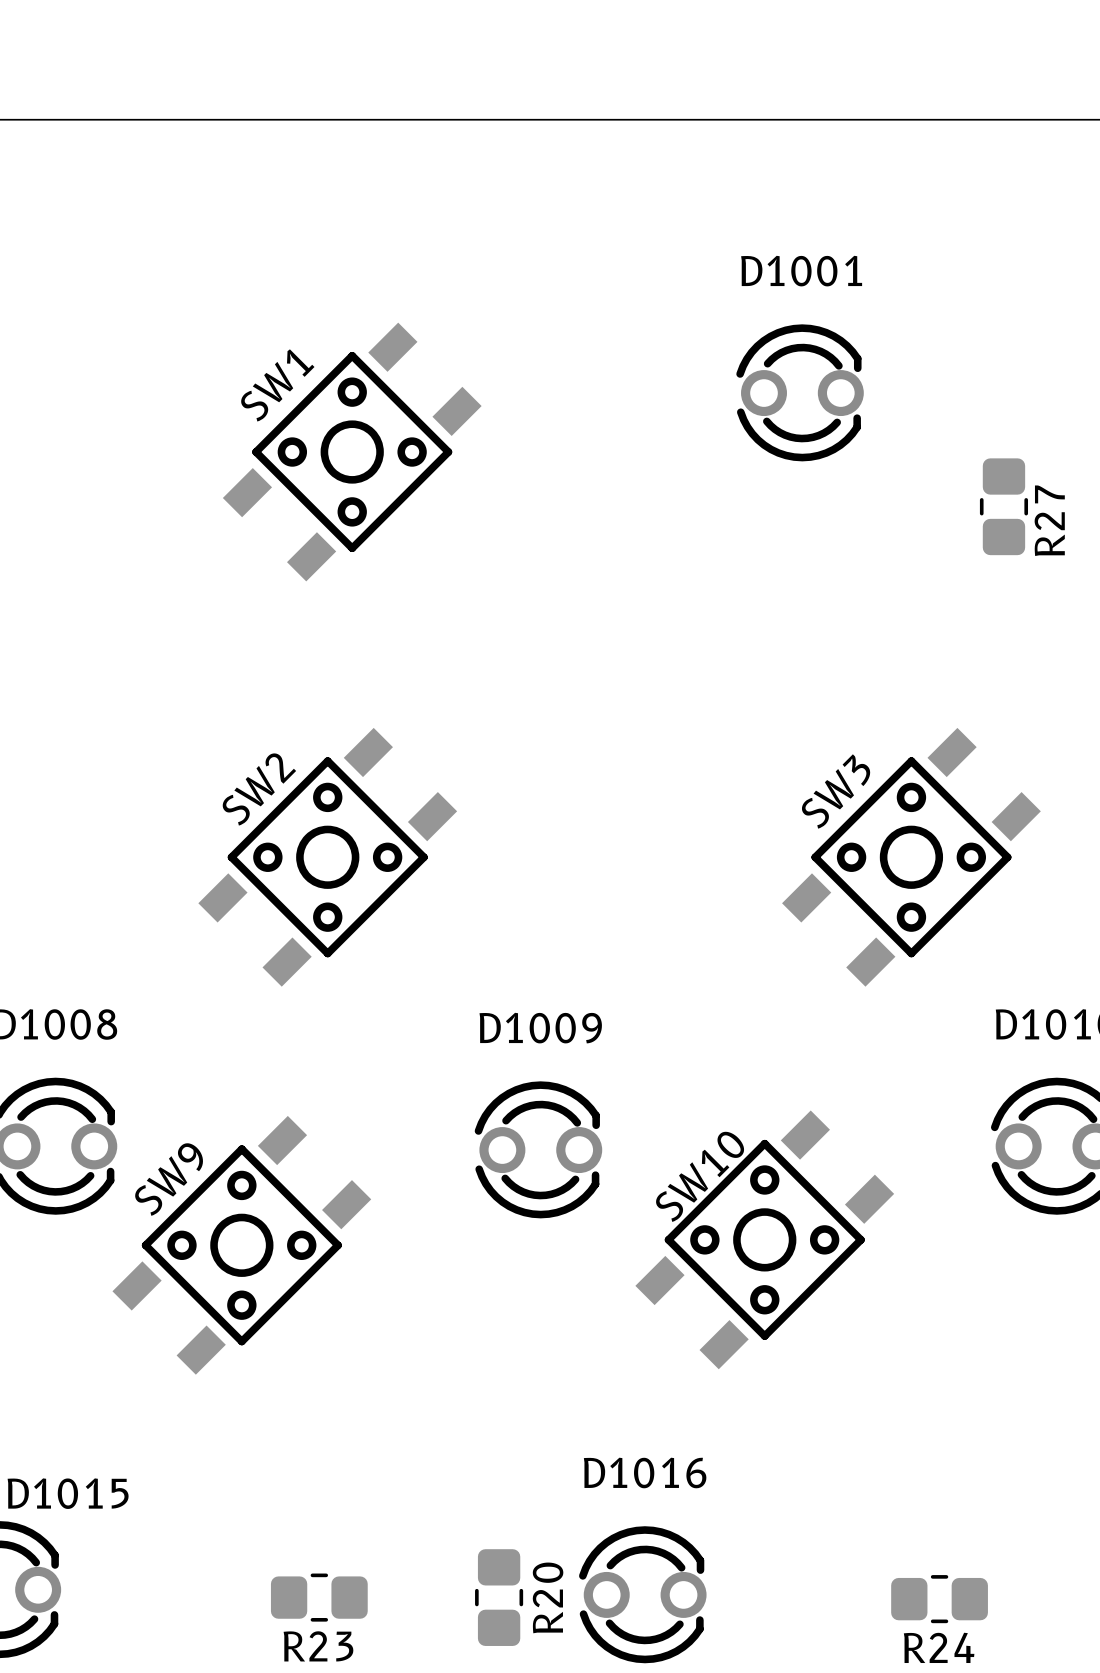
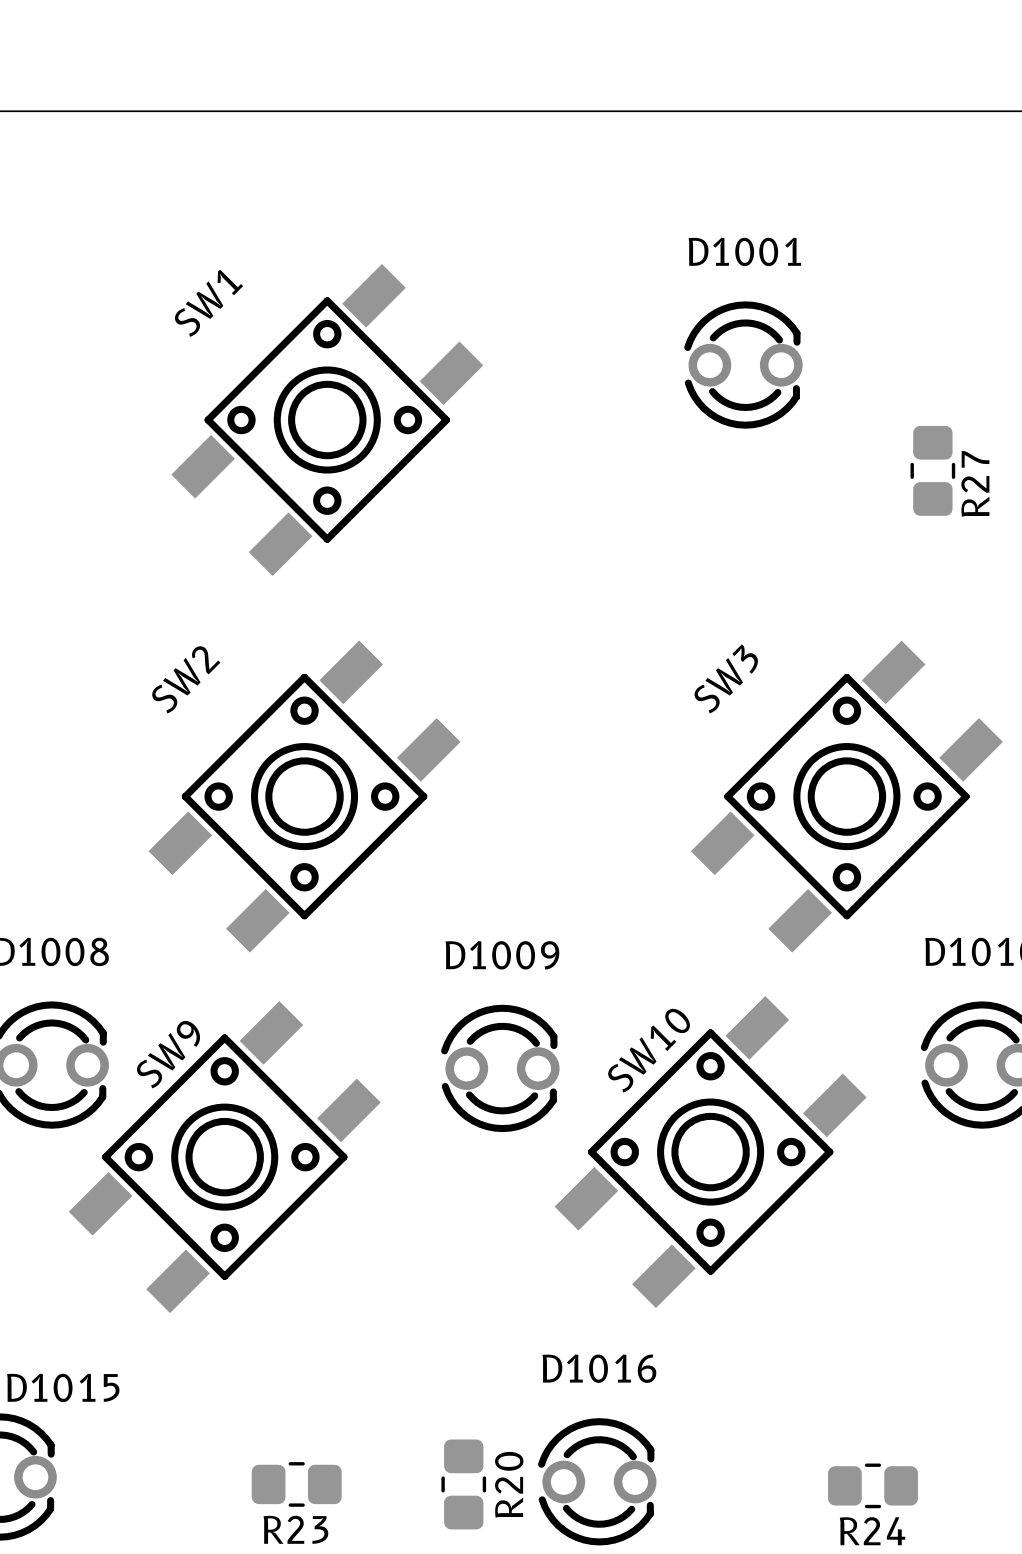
SW1 footprint: [222, 322, 482, 582] -> [171, 264, 484, 577]
SW1 name position: SW1 (277, 385) -> SW1 (208, 303)
SW2 footprint: [198, 727, 458, 987] -> [148, 640, 461, 953]
SW3 footprint: [782, 727, 1041, 987] -> [690, 640, 1003, 953]
SW2 name position: SW2 (259, 789) -> SW2 (186, 679)
SW3 name position: SW3 (835, 791) -> SW3 (726, 678)
SW10 footprint: [635, 1110, 895, 1370] -> [554, 996, 867, 1309]
SW9 footprint: [112, 1115, 372, 1375] -> [68, 1001, 381, 1314]

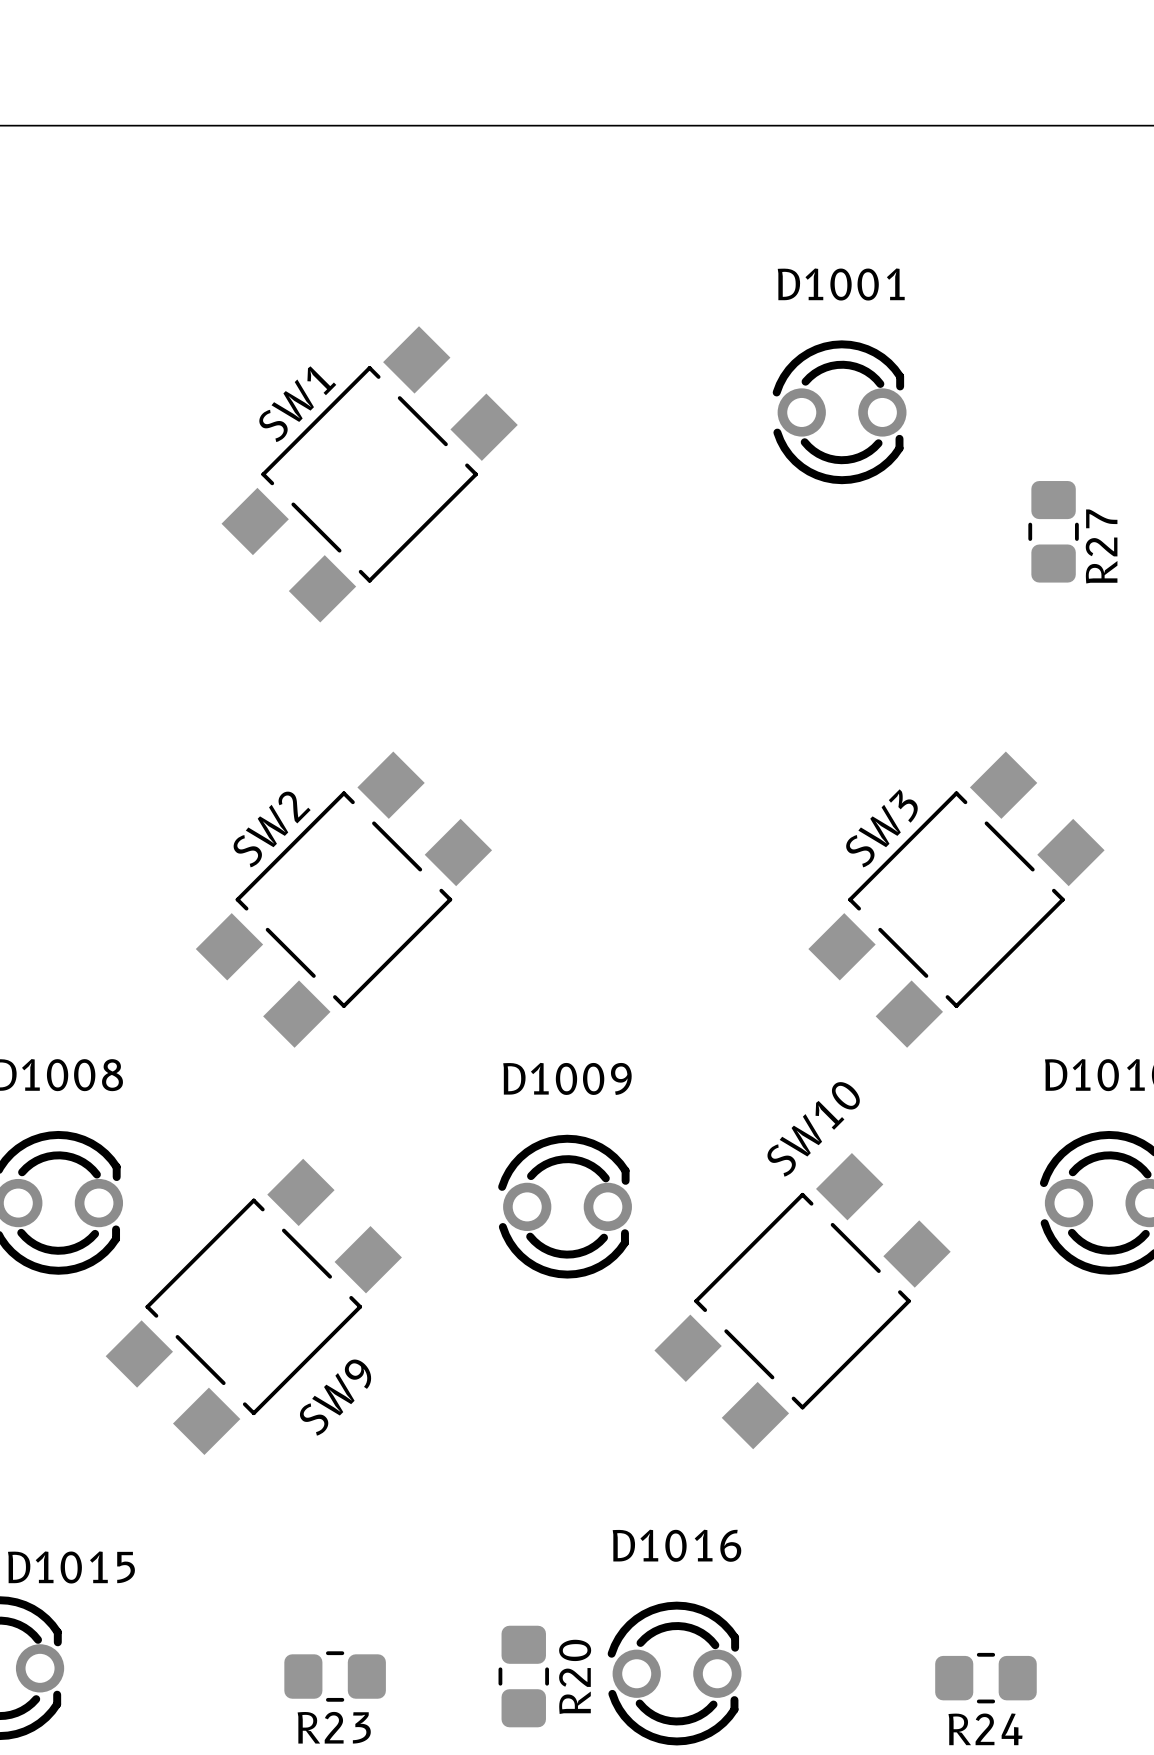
SW1 footprint: [171, 264, 484, 577] -> [221, 326, 518, 623]
SW1 name position: SW1 (208, 303) -> SW1 (297, 404)
SW2 footprint: [148, 640, 461, 953] -> [195, 751, 493, 1048]
SW3 footprint: [690, 640, 1003, 953] -> [808, 751, 1105, 1048]
SW3 name position: SW3 (726, 678) -> SW3 (881, 828)
SW2 name position: SW2 (186, 679) -> SW2 (272, 829)
SW10 footprint: [554, 996, 867, 1309] -> [654, 1153, 951, 1450]
SW9 footprint: [68, 1001, 381, 1314] -> [105, 1158, 402, 1455]
SW10 name position: SW10 (649, 1050) -> SW10 (813, 1129)
SW9 name position: SW9 (168, 1054) -> SW9 (335, 1397)

